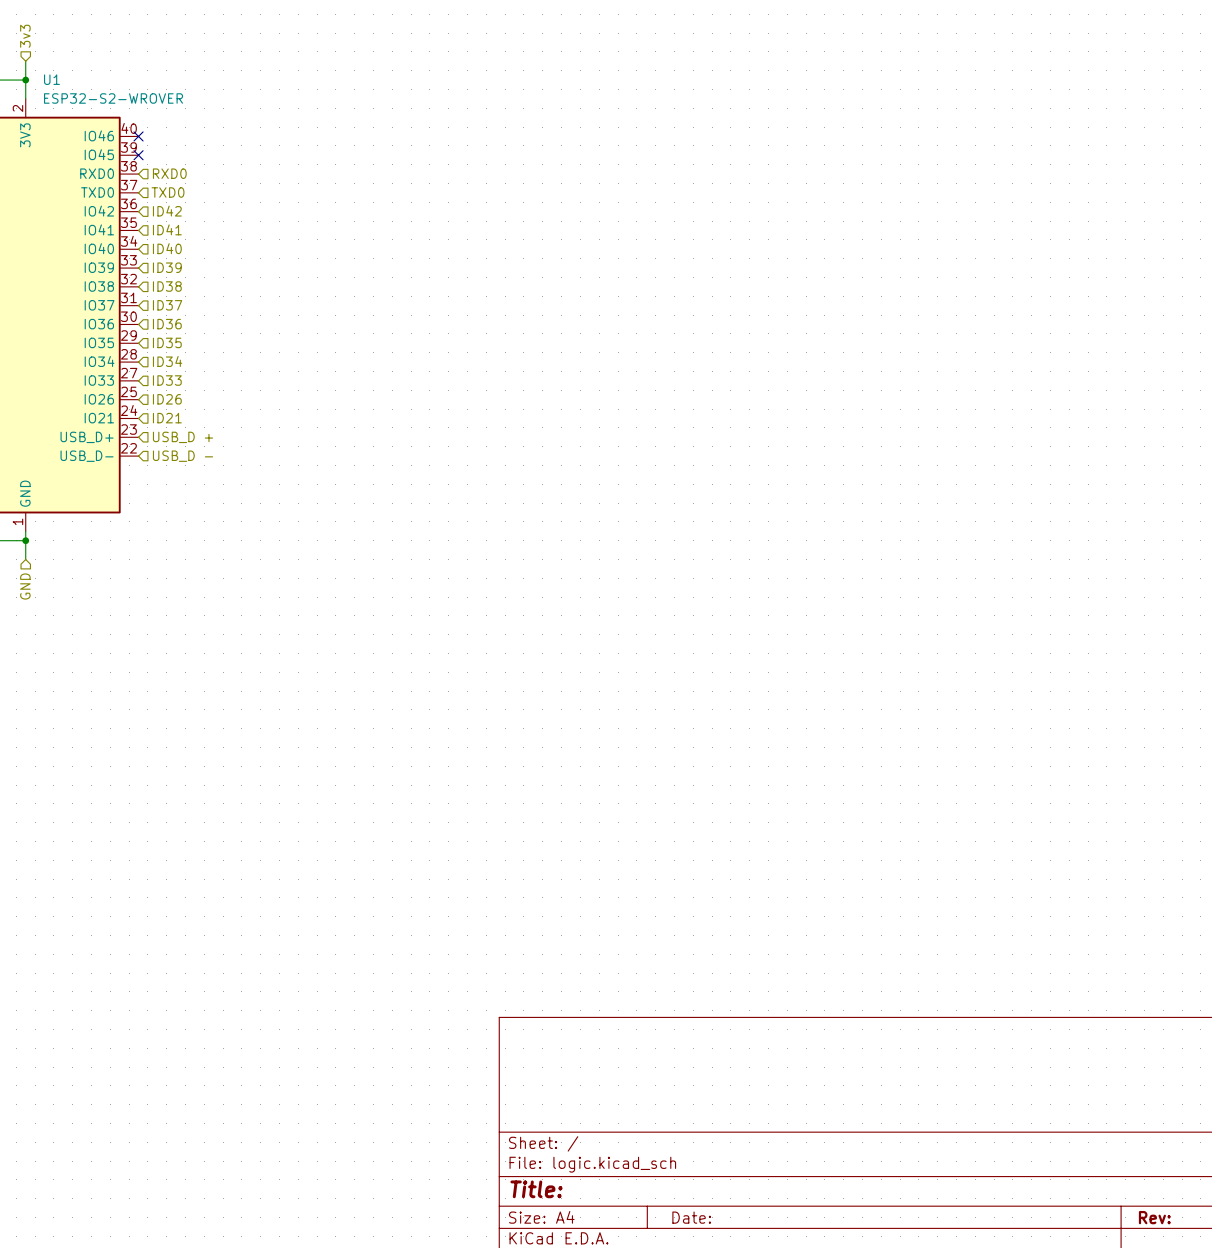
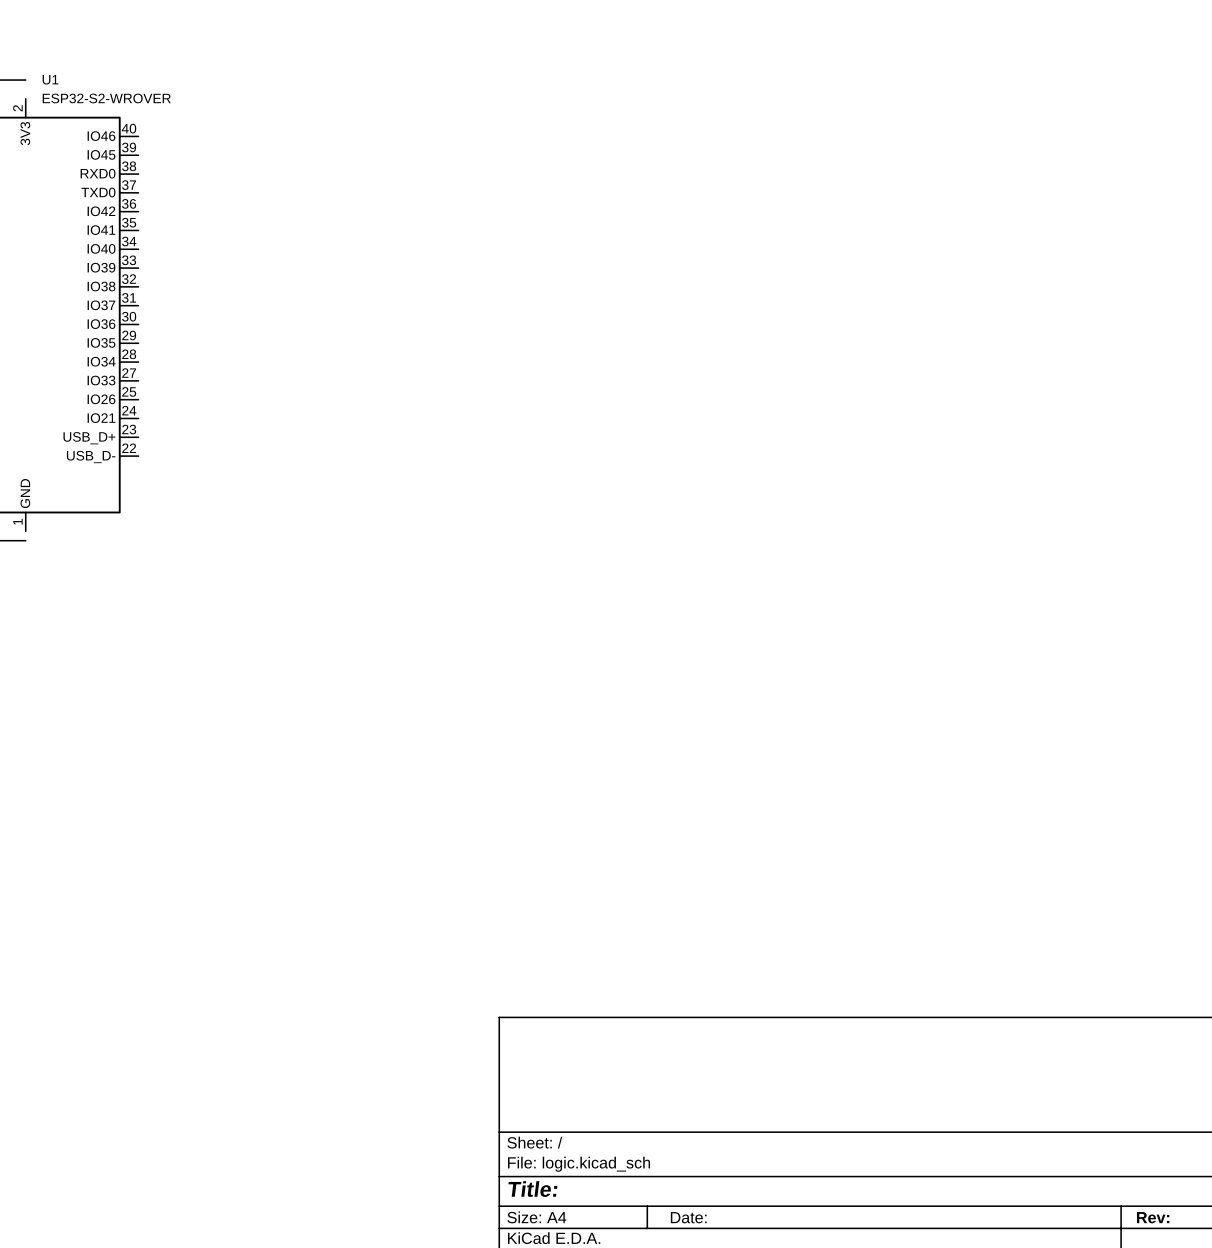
hierarchical label: 3v3 (25, 36) -> none
wire: (25, 61) (25, 98) -> none
junction: (25, 80) -> none
no-connect mark: (138, 136) -> none
no-connect mark: (138, 155) -> none
hierarchical label: RXD0 (169, 173) -> none
hierarchical label: TXD0 (168, 192) -> none
hierarchical label: ID42 (167, 211) -> none
hierarchical label: ID41 (167, 229) -> none
hierarchical label: ID40 (167, 248) -> none
hierarchical label: ID39 (167, 267) -> none
hierarchical label: ID38 (167, 286) -> none
hierarchical label: ID37 (167, 305) -> none
hierarchical label: ID36 (167, 324) -> none
hierarchical label: ID35 (167, 342) -> none
hierarchical label: ID34 (167, 361) -> none
hierarchical label: ID33 (167, 380) -> none
hierarchical label: ID26 (167, 399) -> none
hierarchical label: ID21 (167, 418) -> none
hierarchical label: USB_D + (183, 437) -> none
hierarchical label: USB_D - (183, 456) -> none
wire: (25, 531) (25, 559) -> none
junction: (25, 540) -> none
hierarchical label: GND (25, 586) -> none

